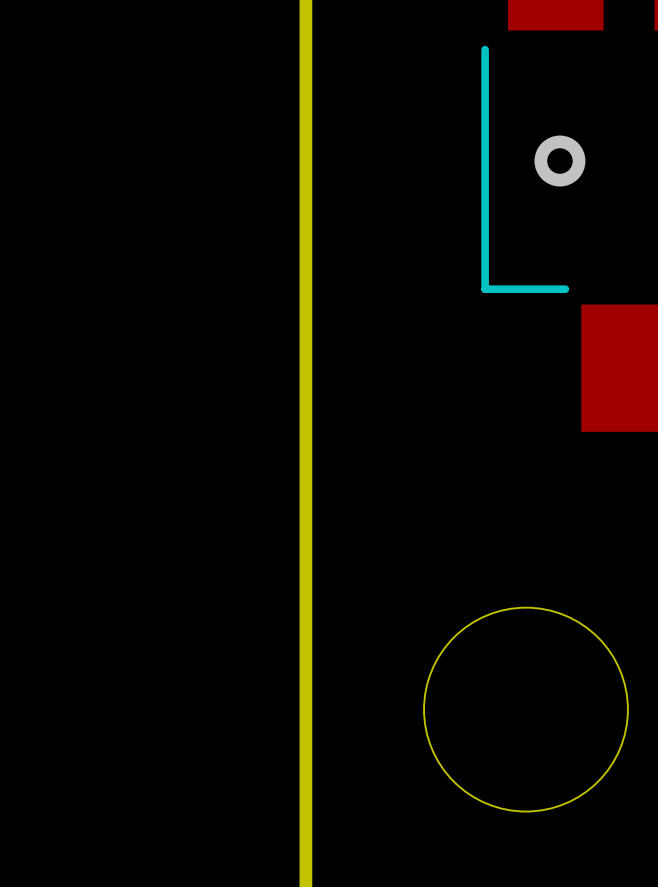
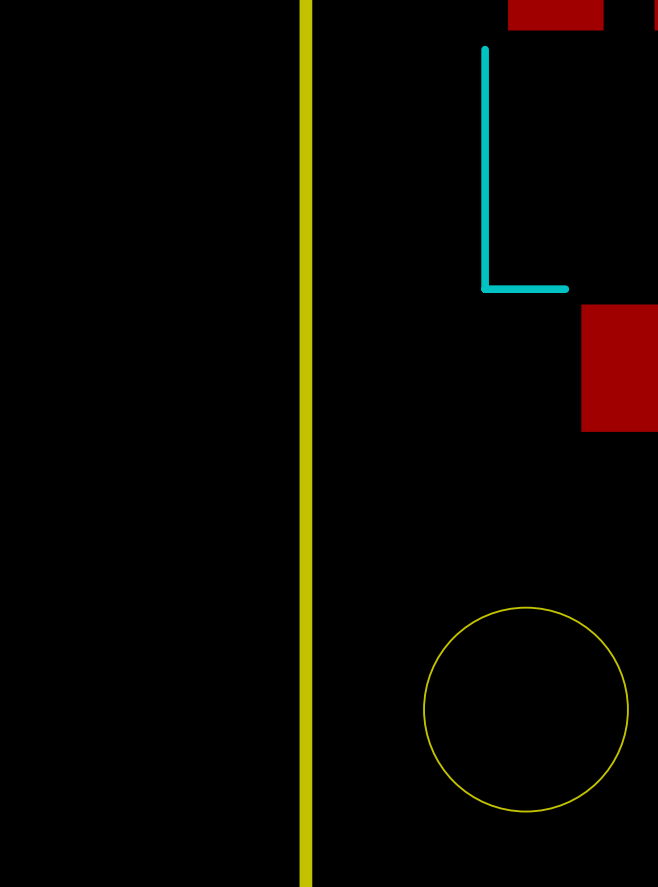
via: (559, 161) -> none

